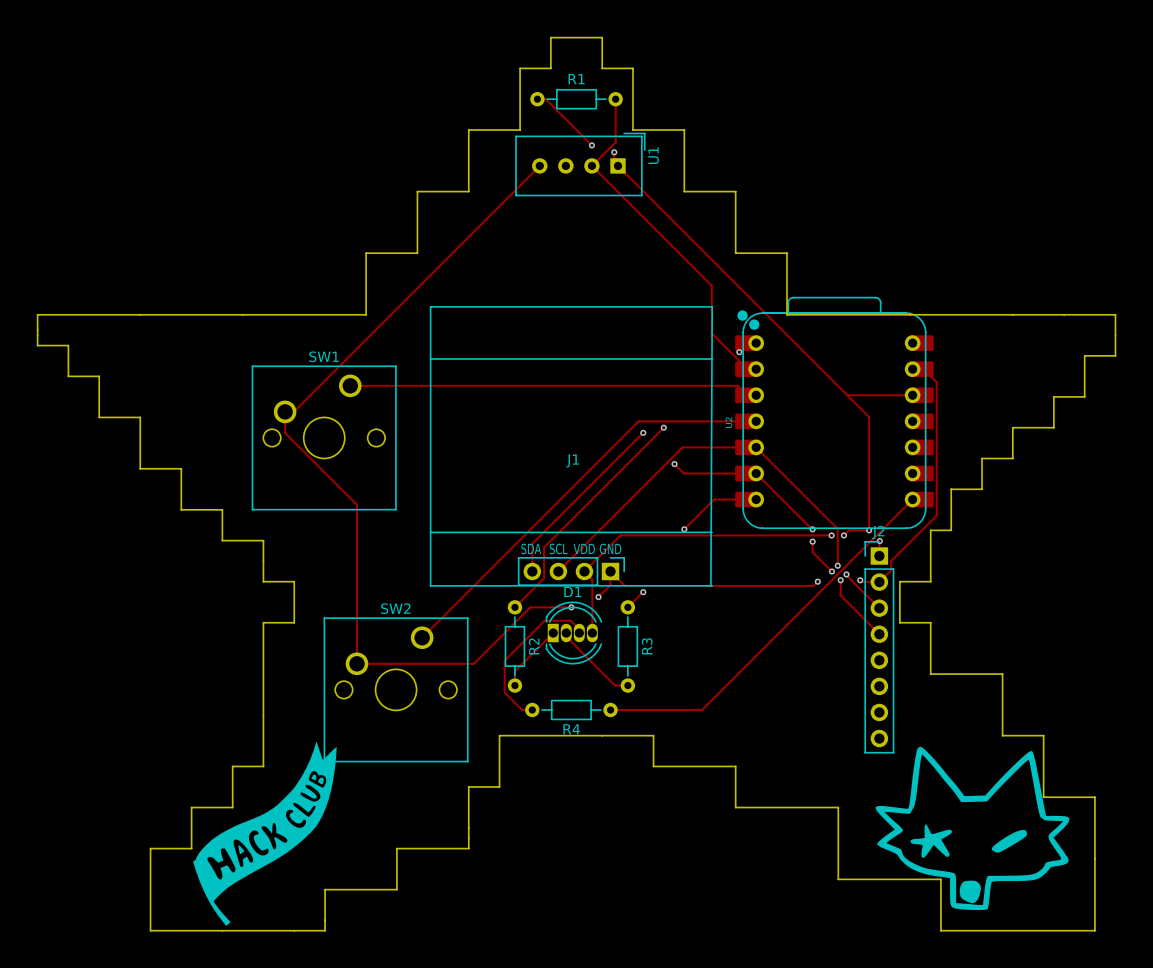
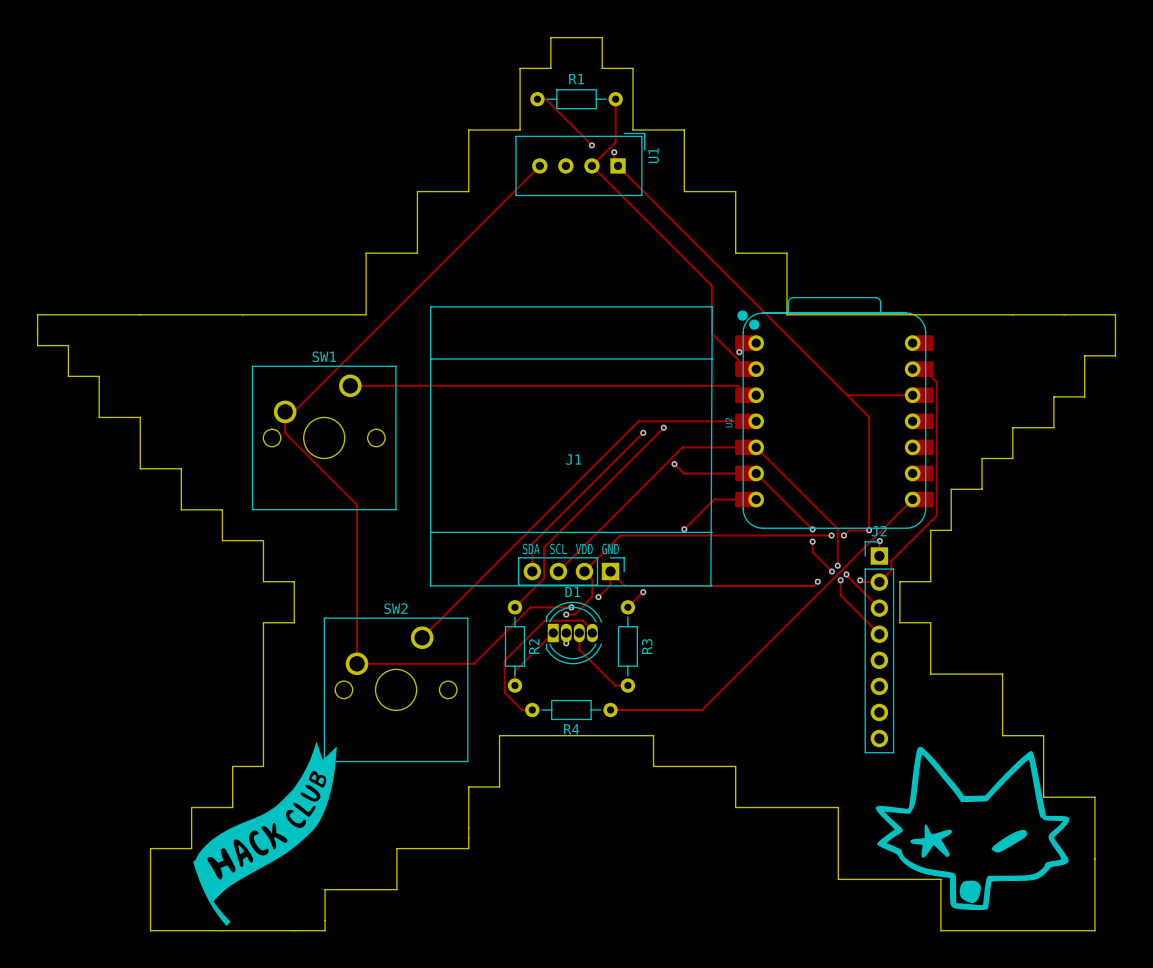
track: (592, 596) (592, 630) -> (592, 596) (574, 614) (566, 614)
via: none -> (566, 614)
track: (570, 620) (579, 629) -> (570, 620) (582, 620) (592, 630)
track: (566, 636) (579, 649) -> (579, 633) (579, 649)
via: none -> (566, 643)

